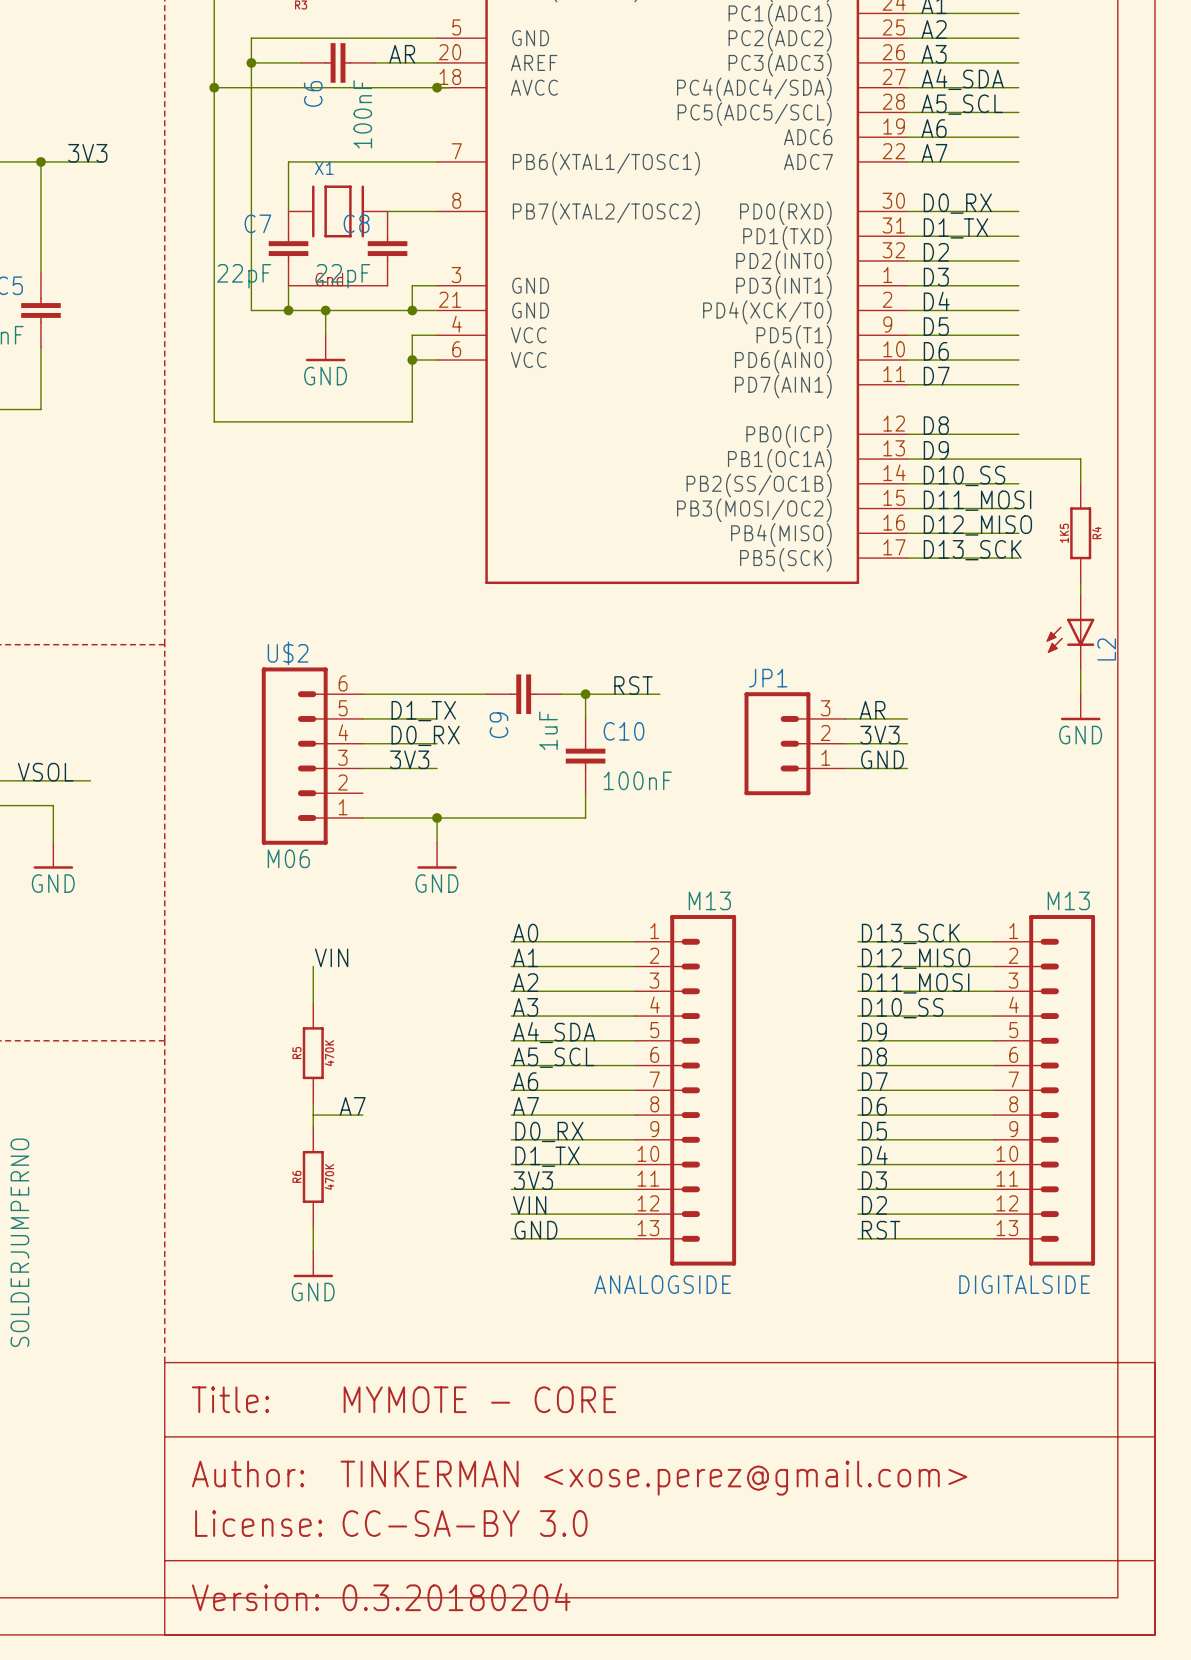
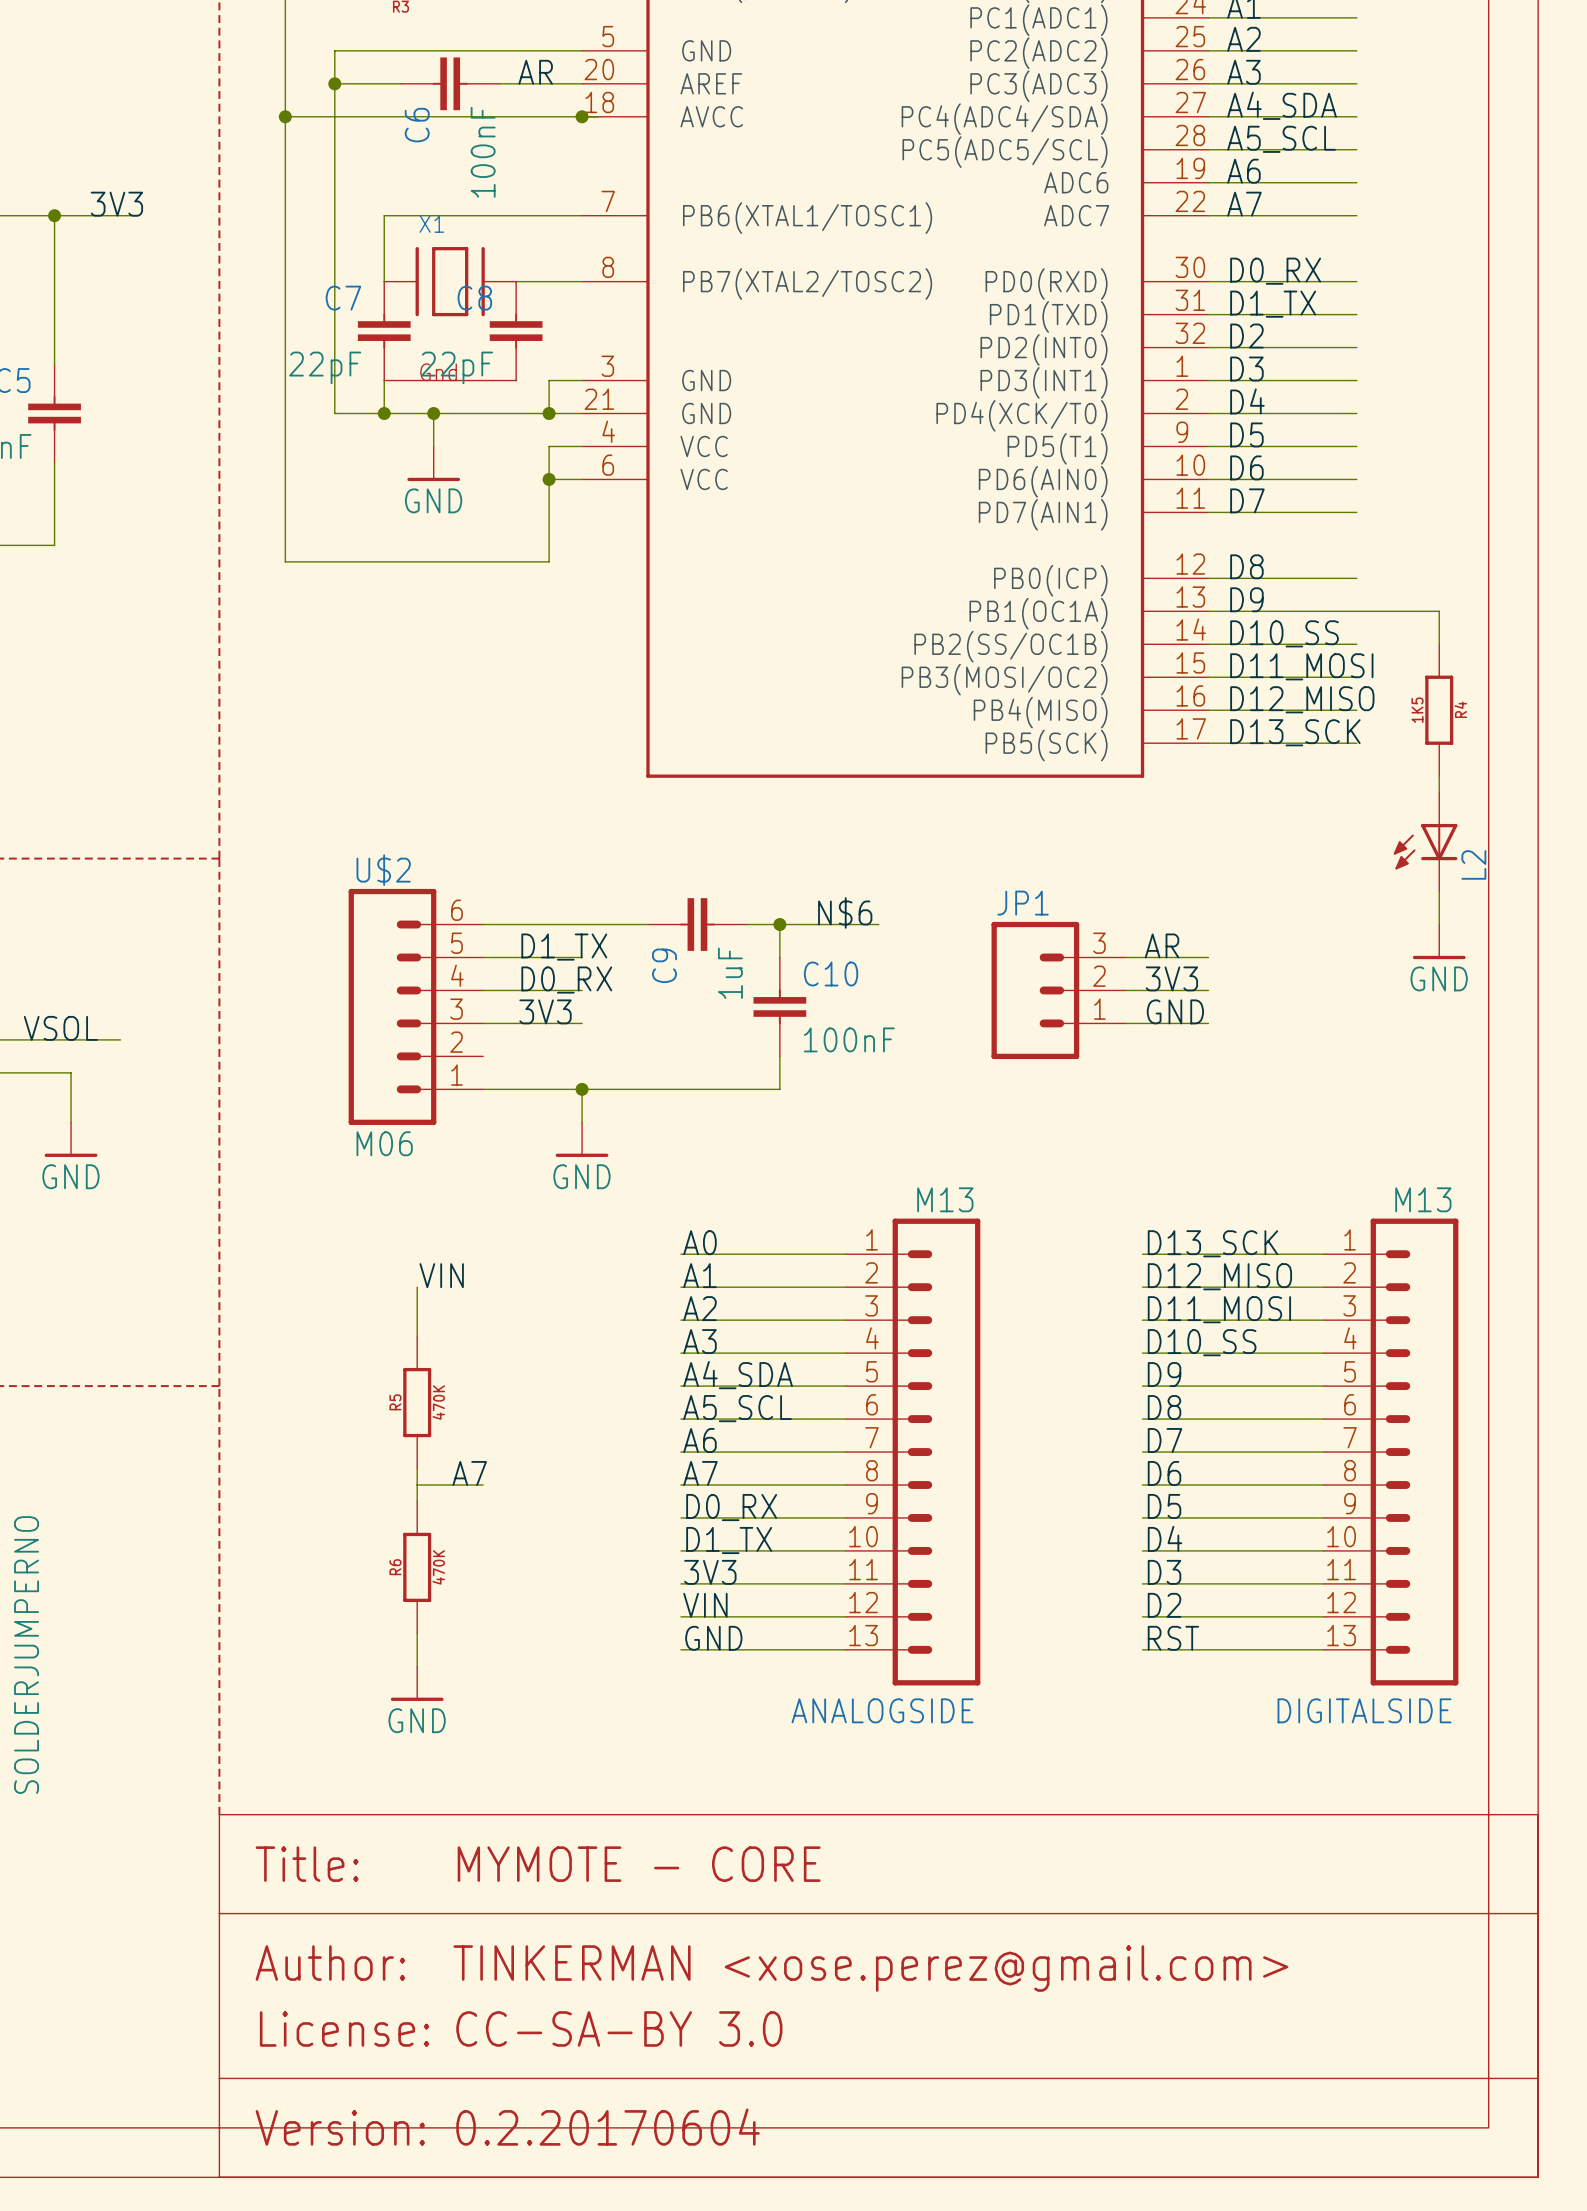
label: RST (633, 685) -> N$6 (845, 912)
part text: 0.3.20180204 (456, 1597) -> 0.2.20170604 (608, 2127)

